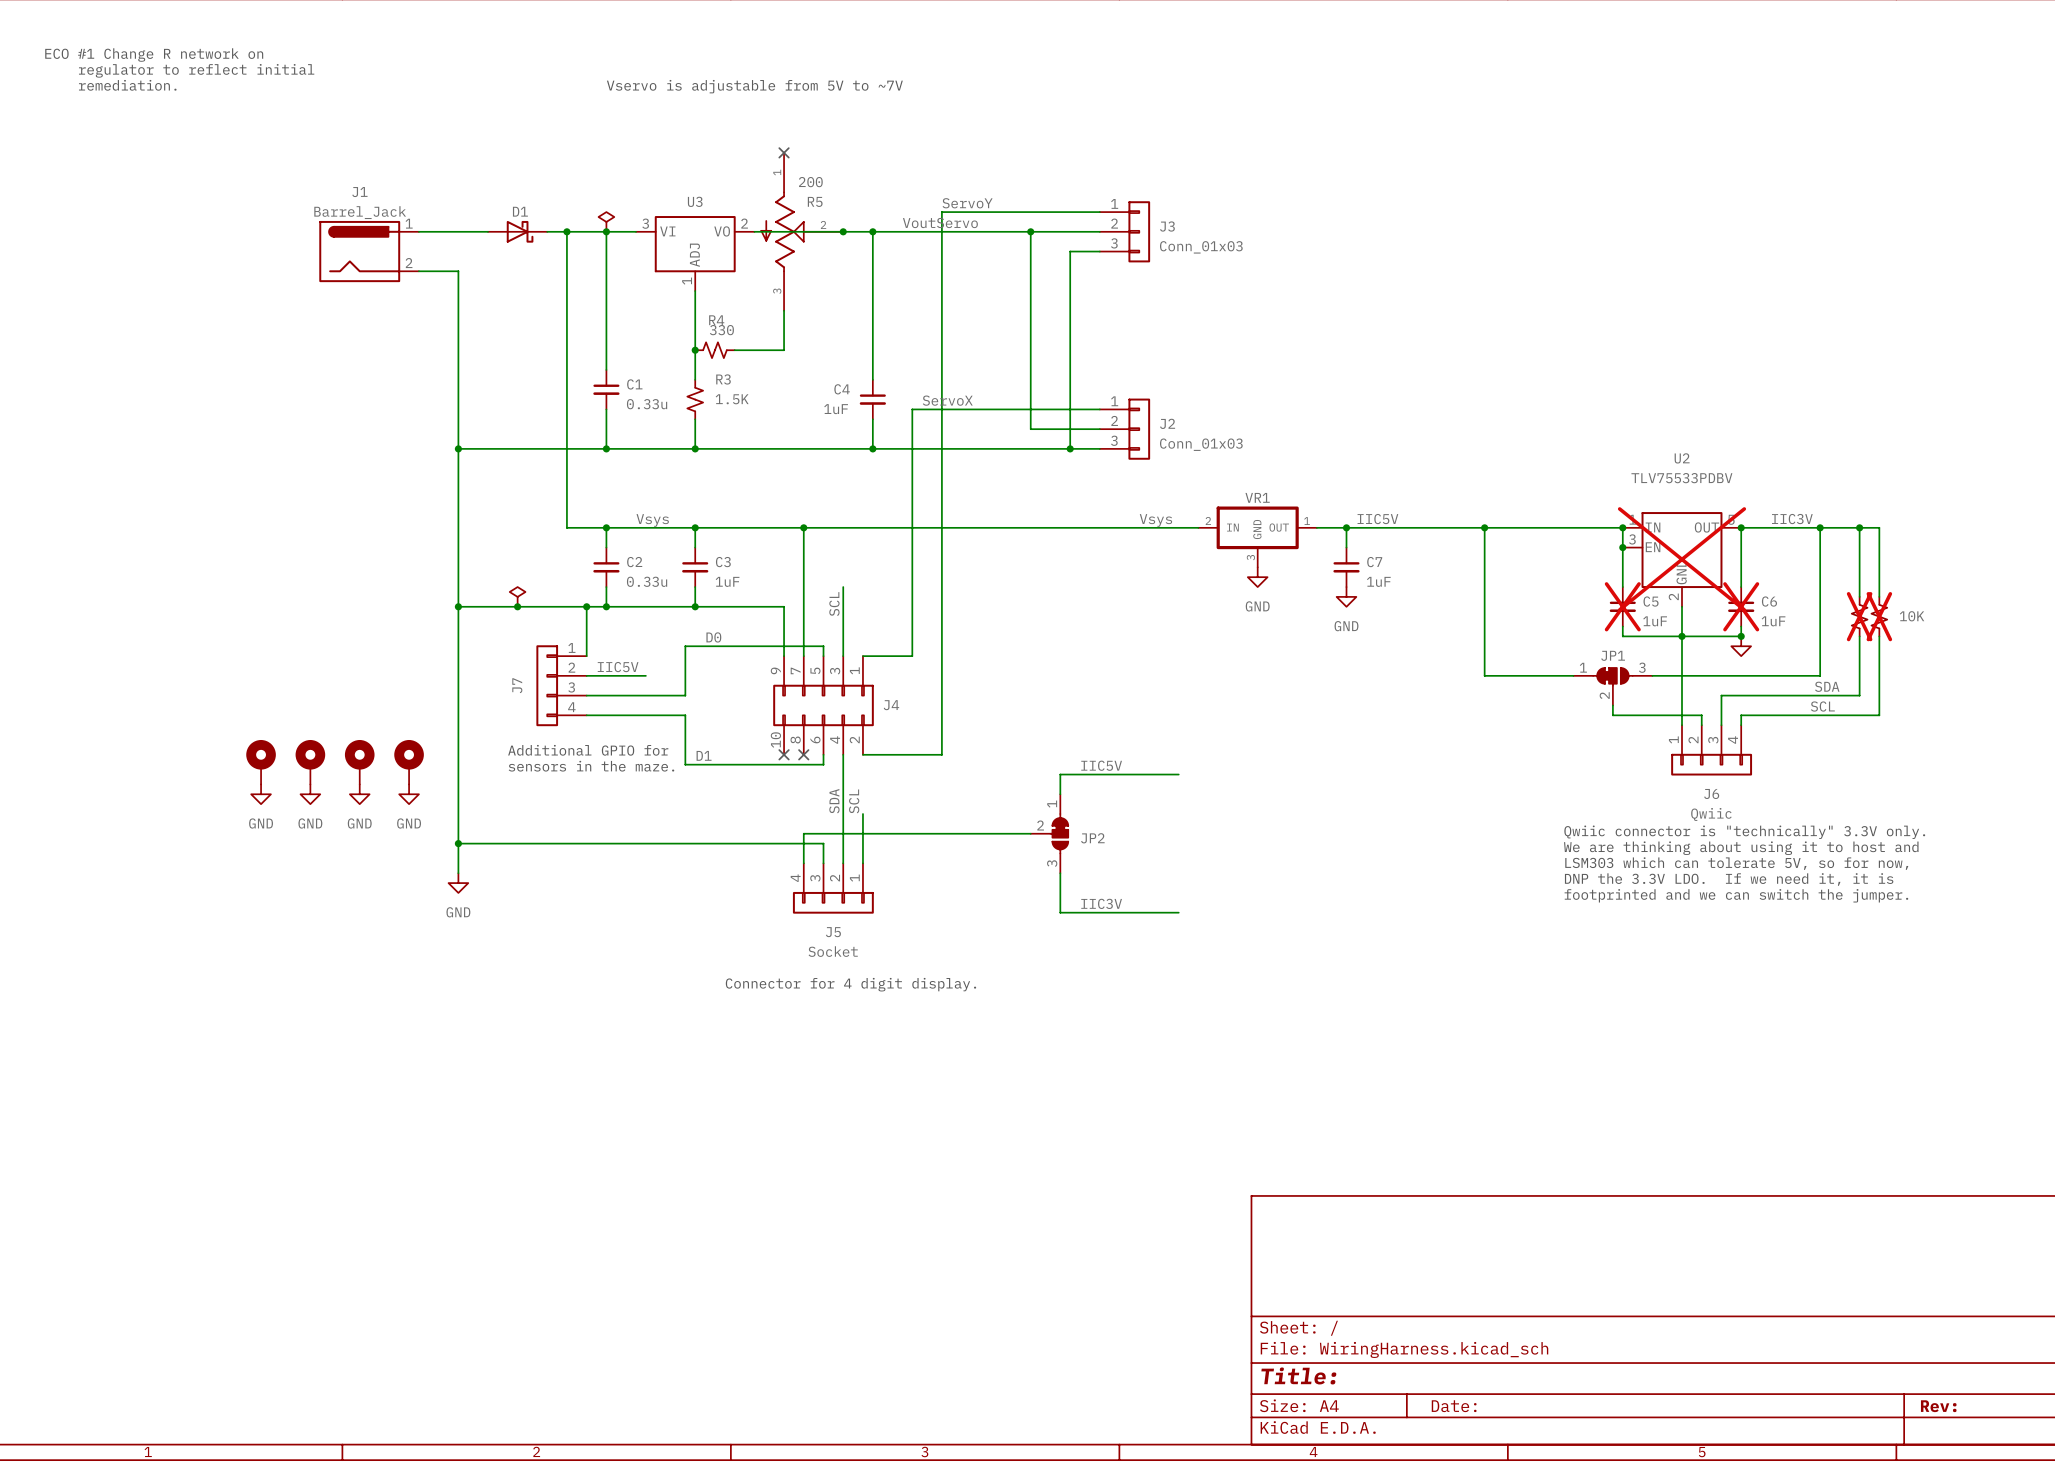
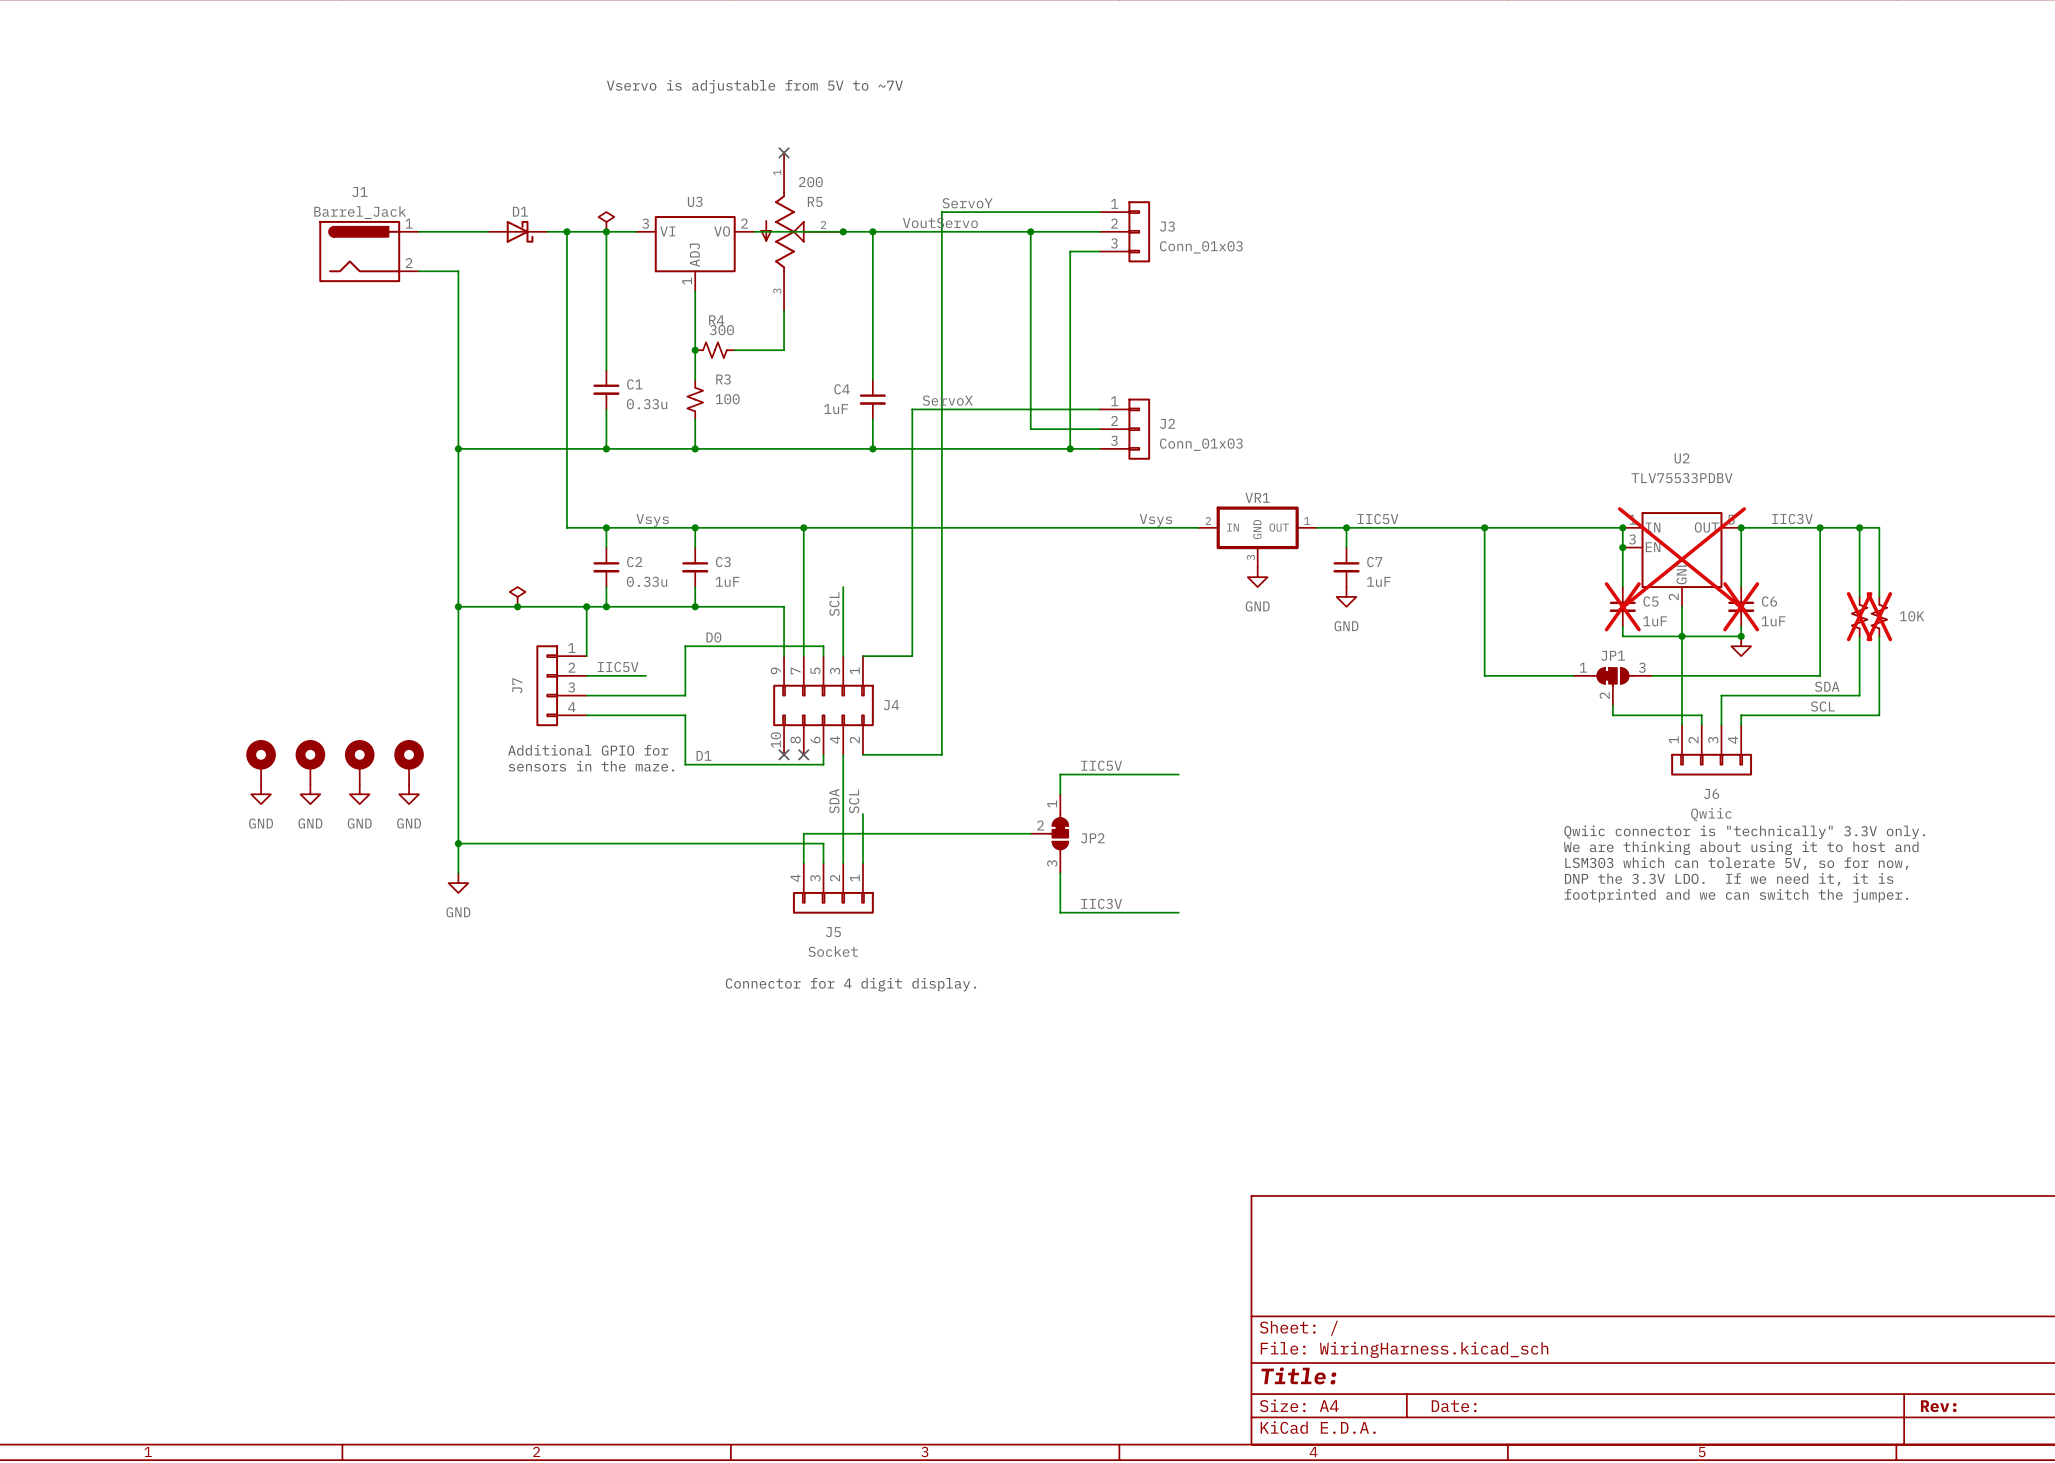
text: ECO #1 Change R network on (154, 55) -> none
text: regulator to reflect initial (196, 70) -> none
text: remediation. (127, 85) -> none
R4 value: 330 (721, 330) -> 300 (721, 330)
R3 value: 1.5K (732, 399) -> 100 (727, 399)

